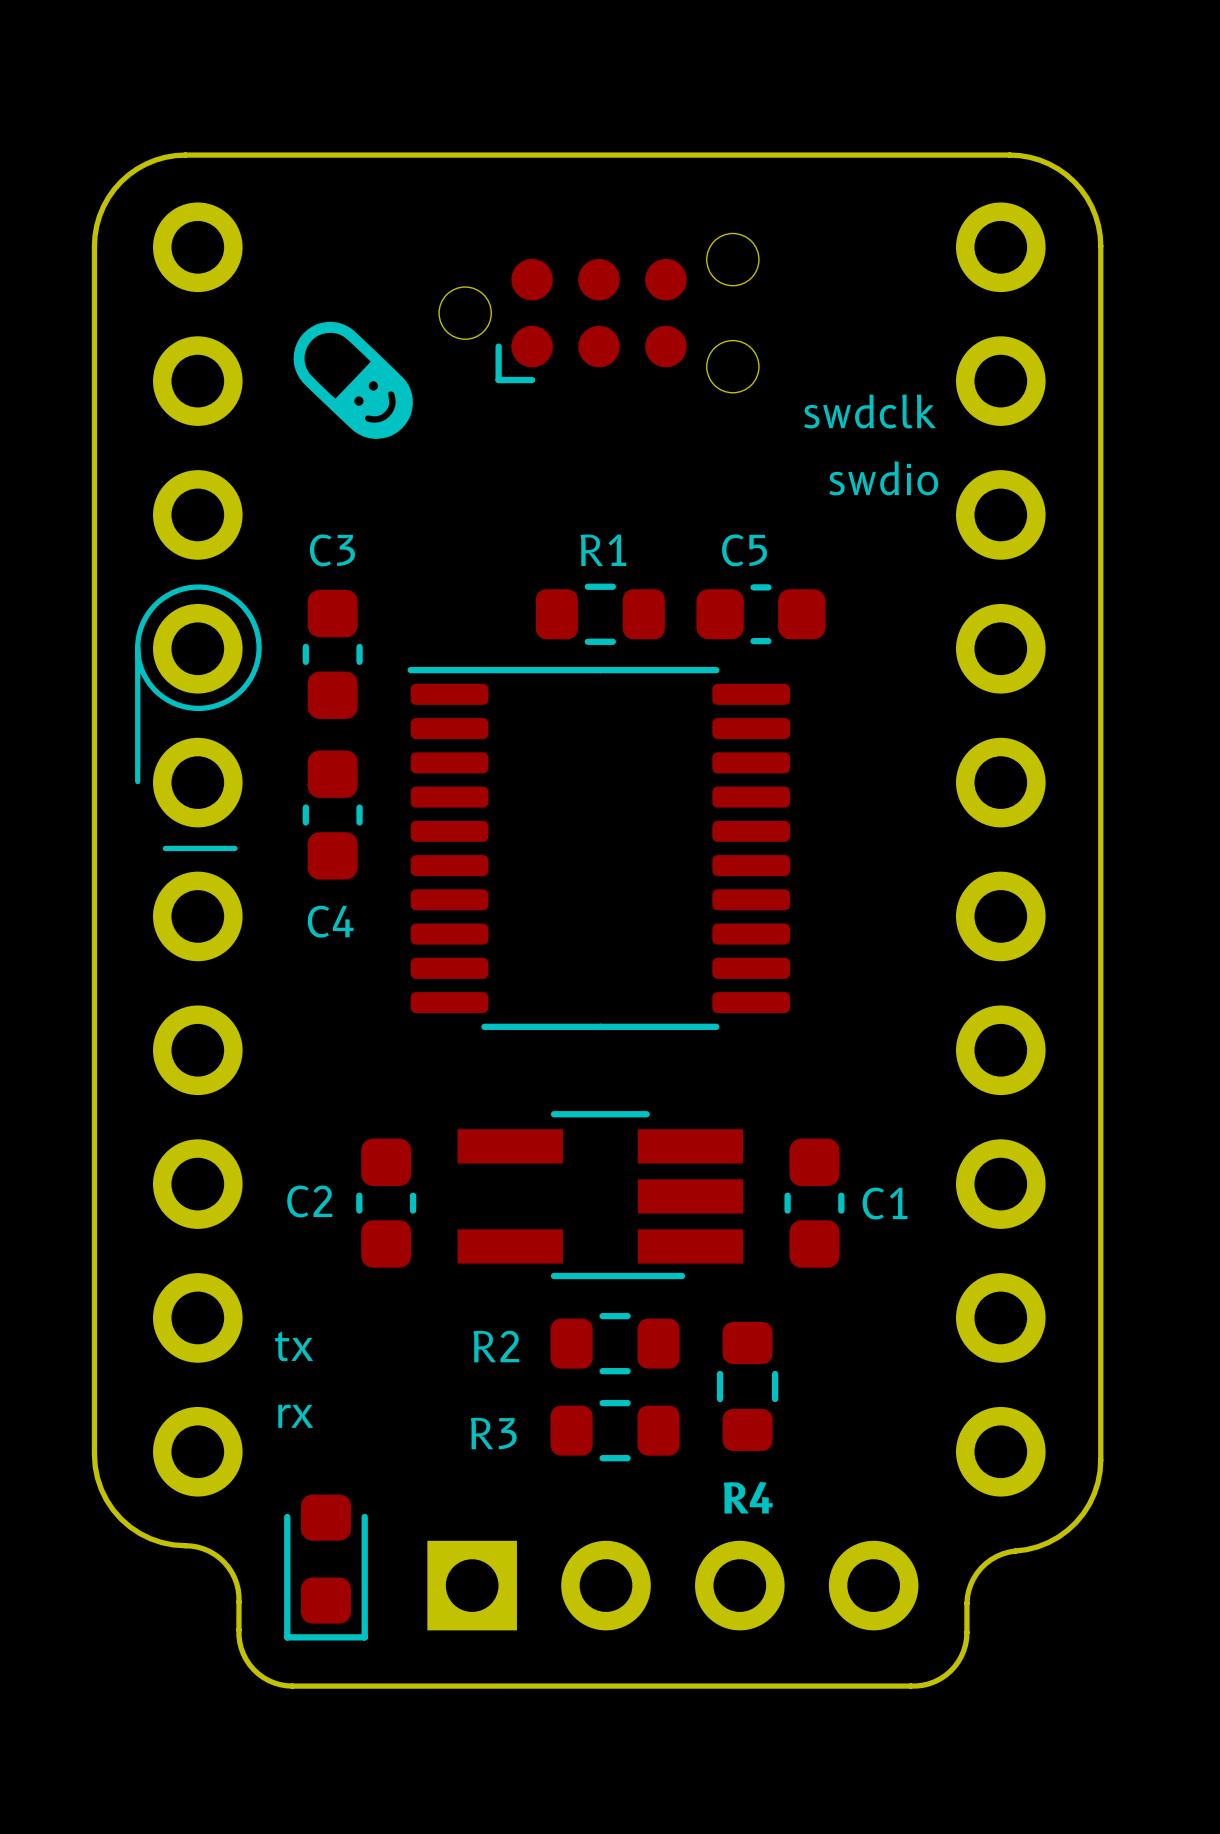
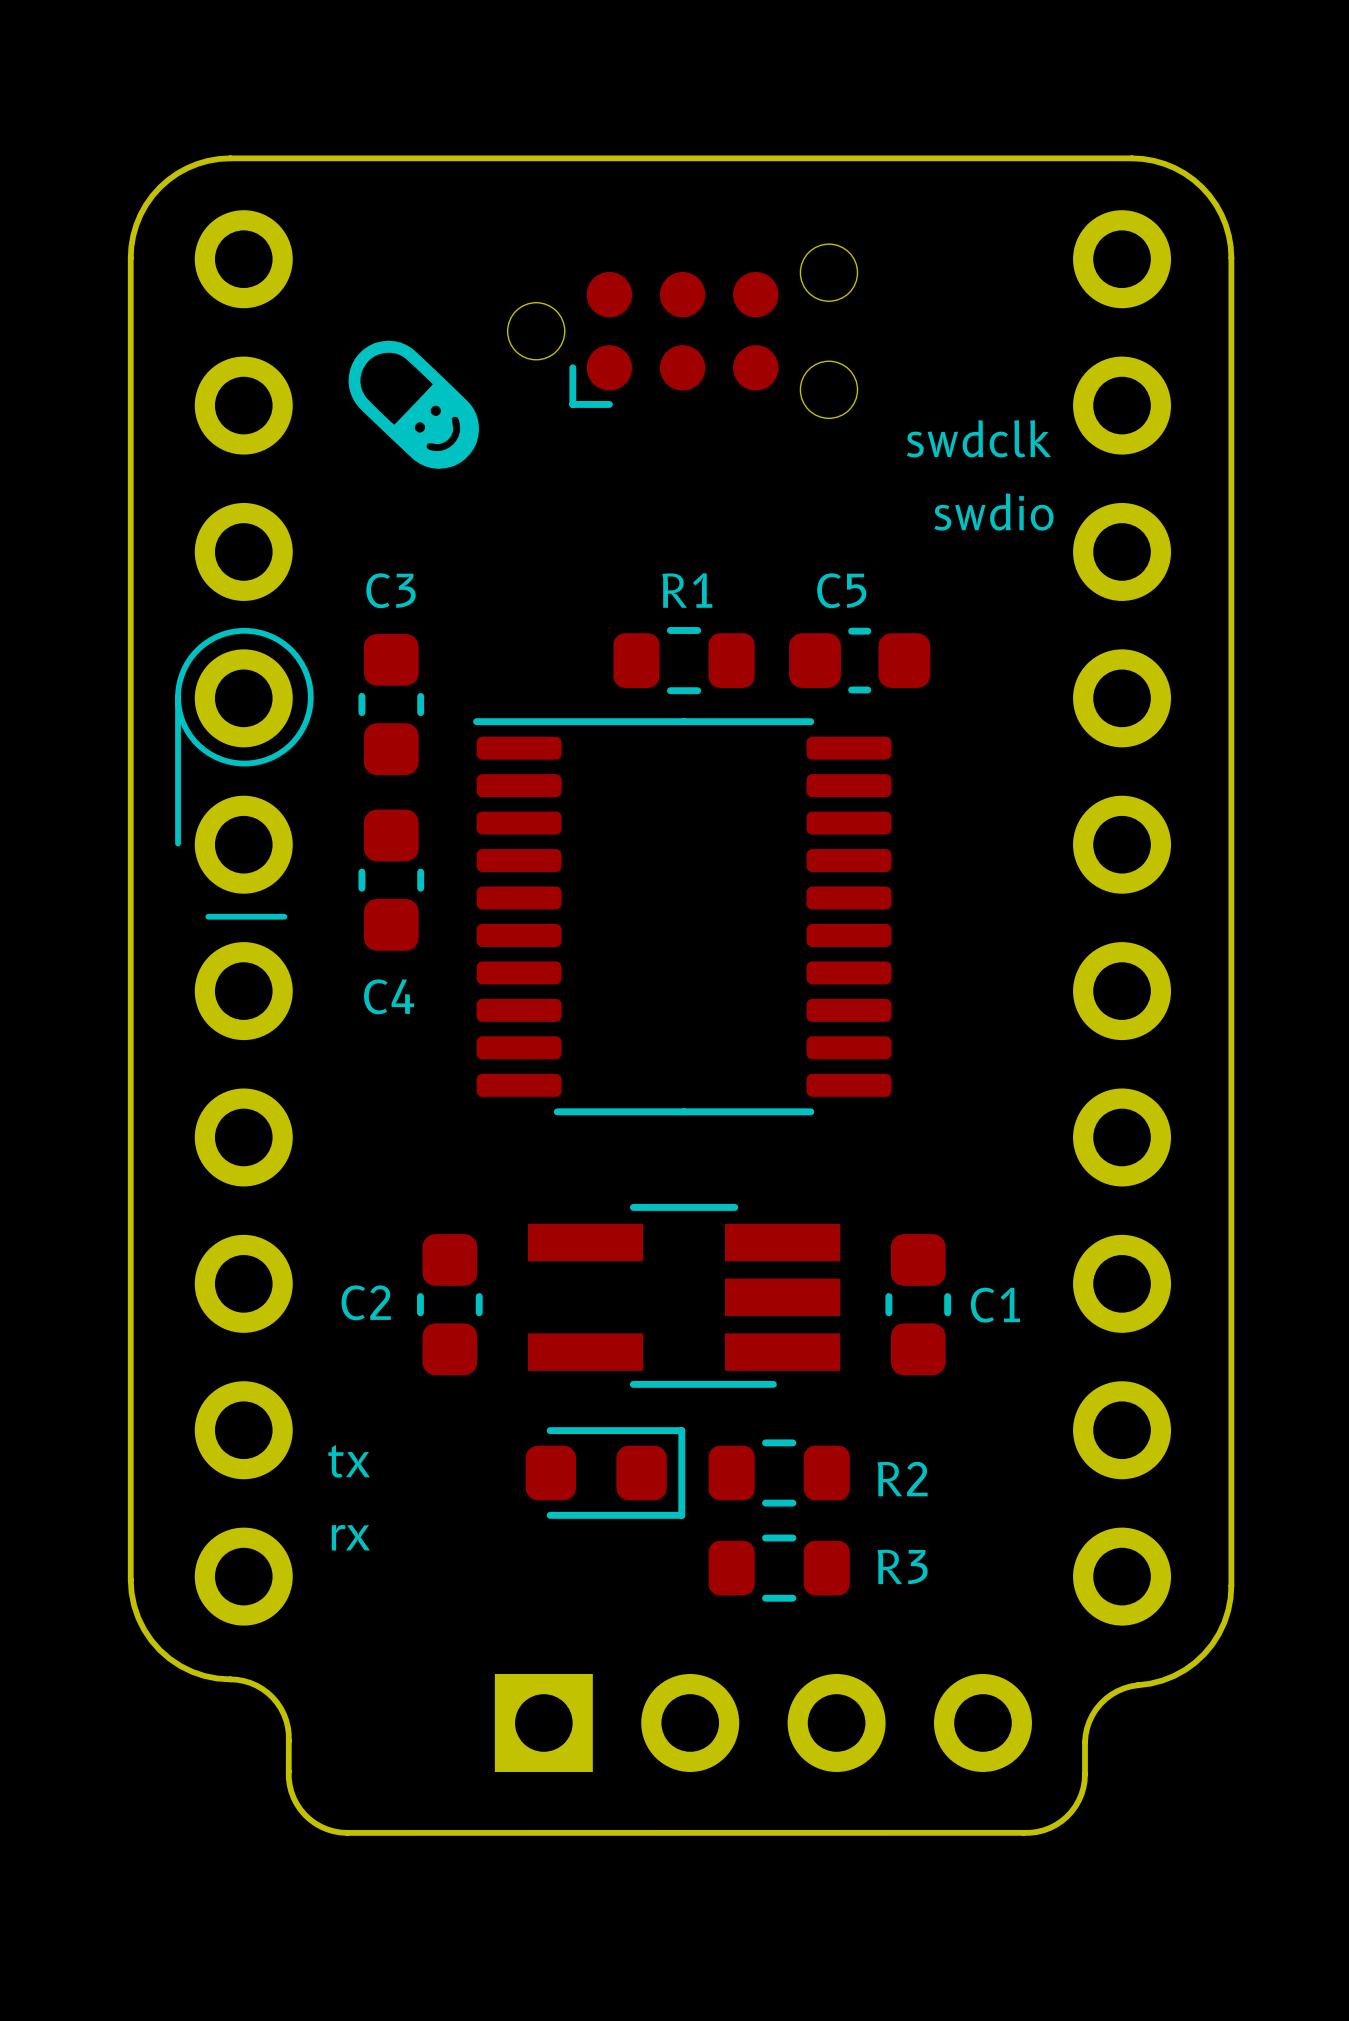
R2 position: (615, 1343) -> (779, 1472)
R2 name position: R2 (496, 1346) -> R2 (902, 1479)
R4: (747, 1386) -> none
R3 position: (615, 1430) -> (779, 1568)
R3 name position: R3 (493, 1433) -> R3 (902, 1566)
part rotation: 0° (326, 1567) -> 90° counterclockwise (605, 1472)
part position: (326, 1567) -> (605, 1472)

